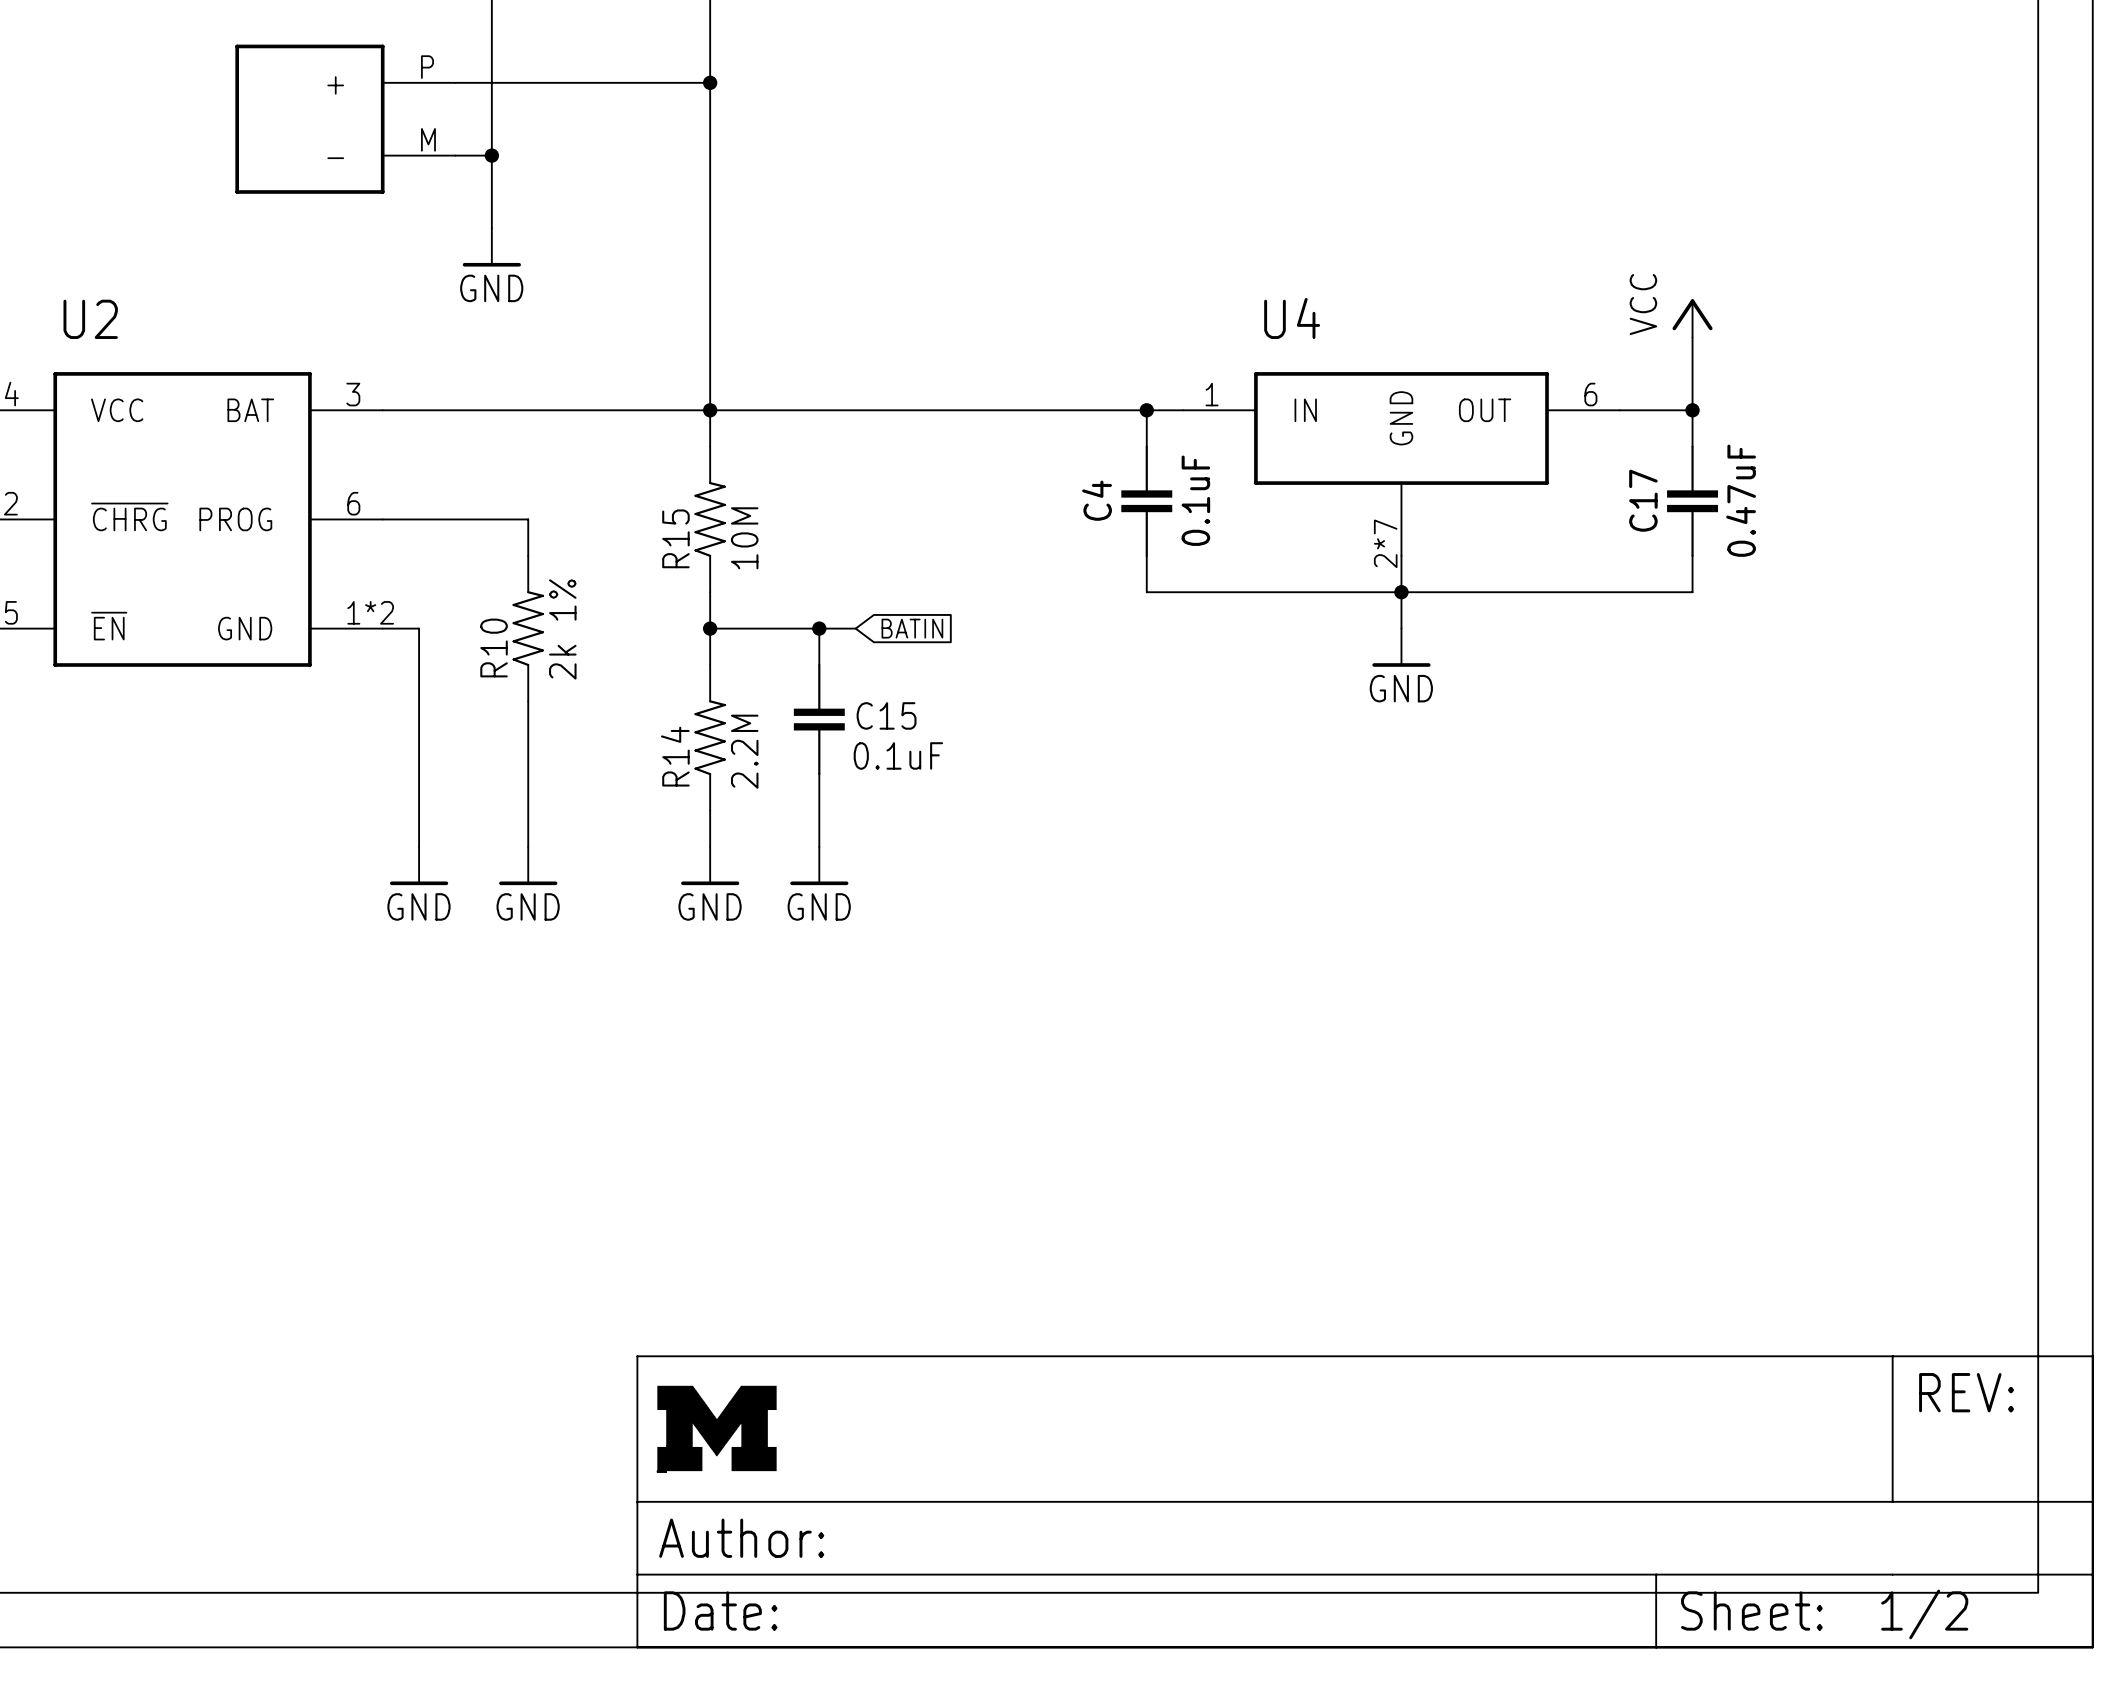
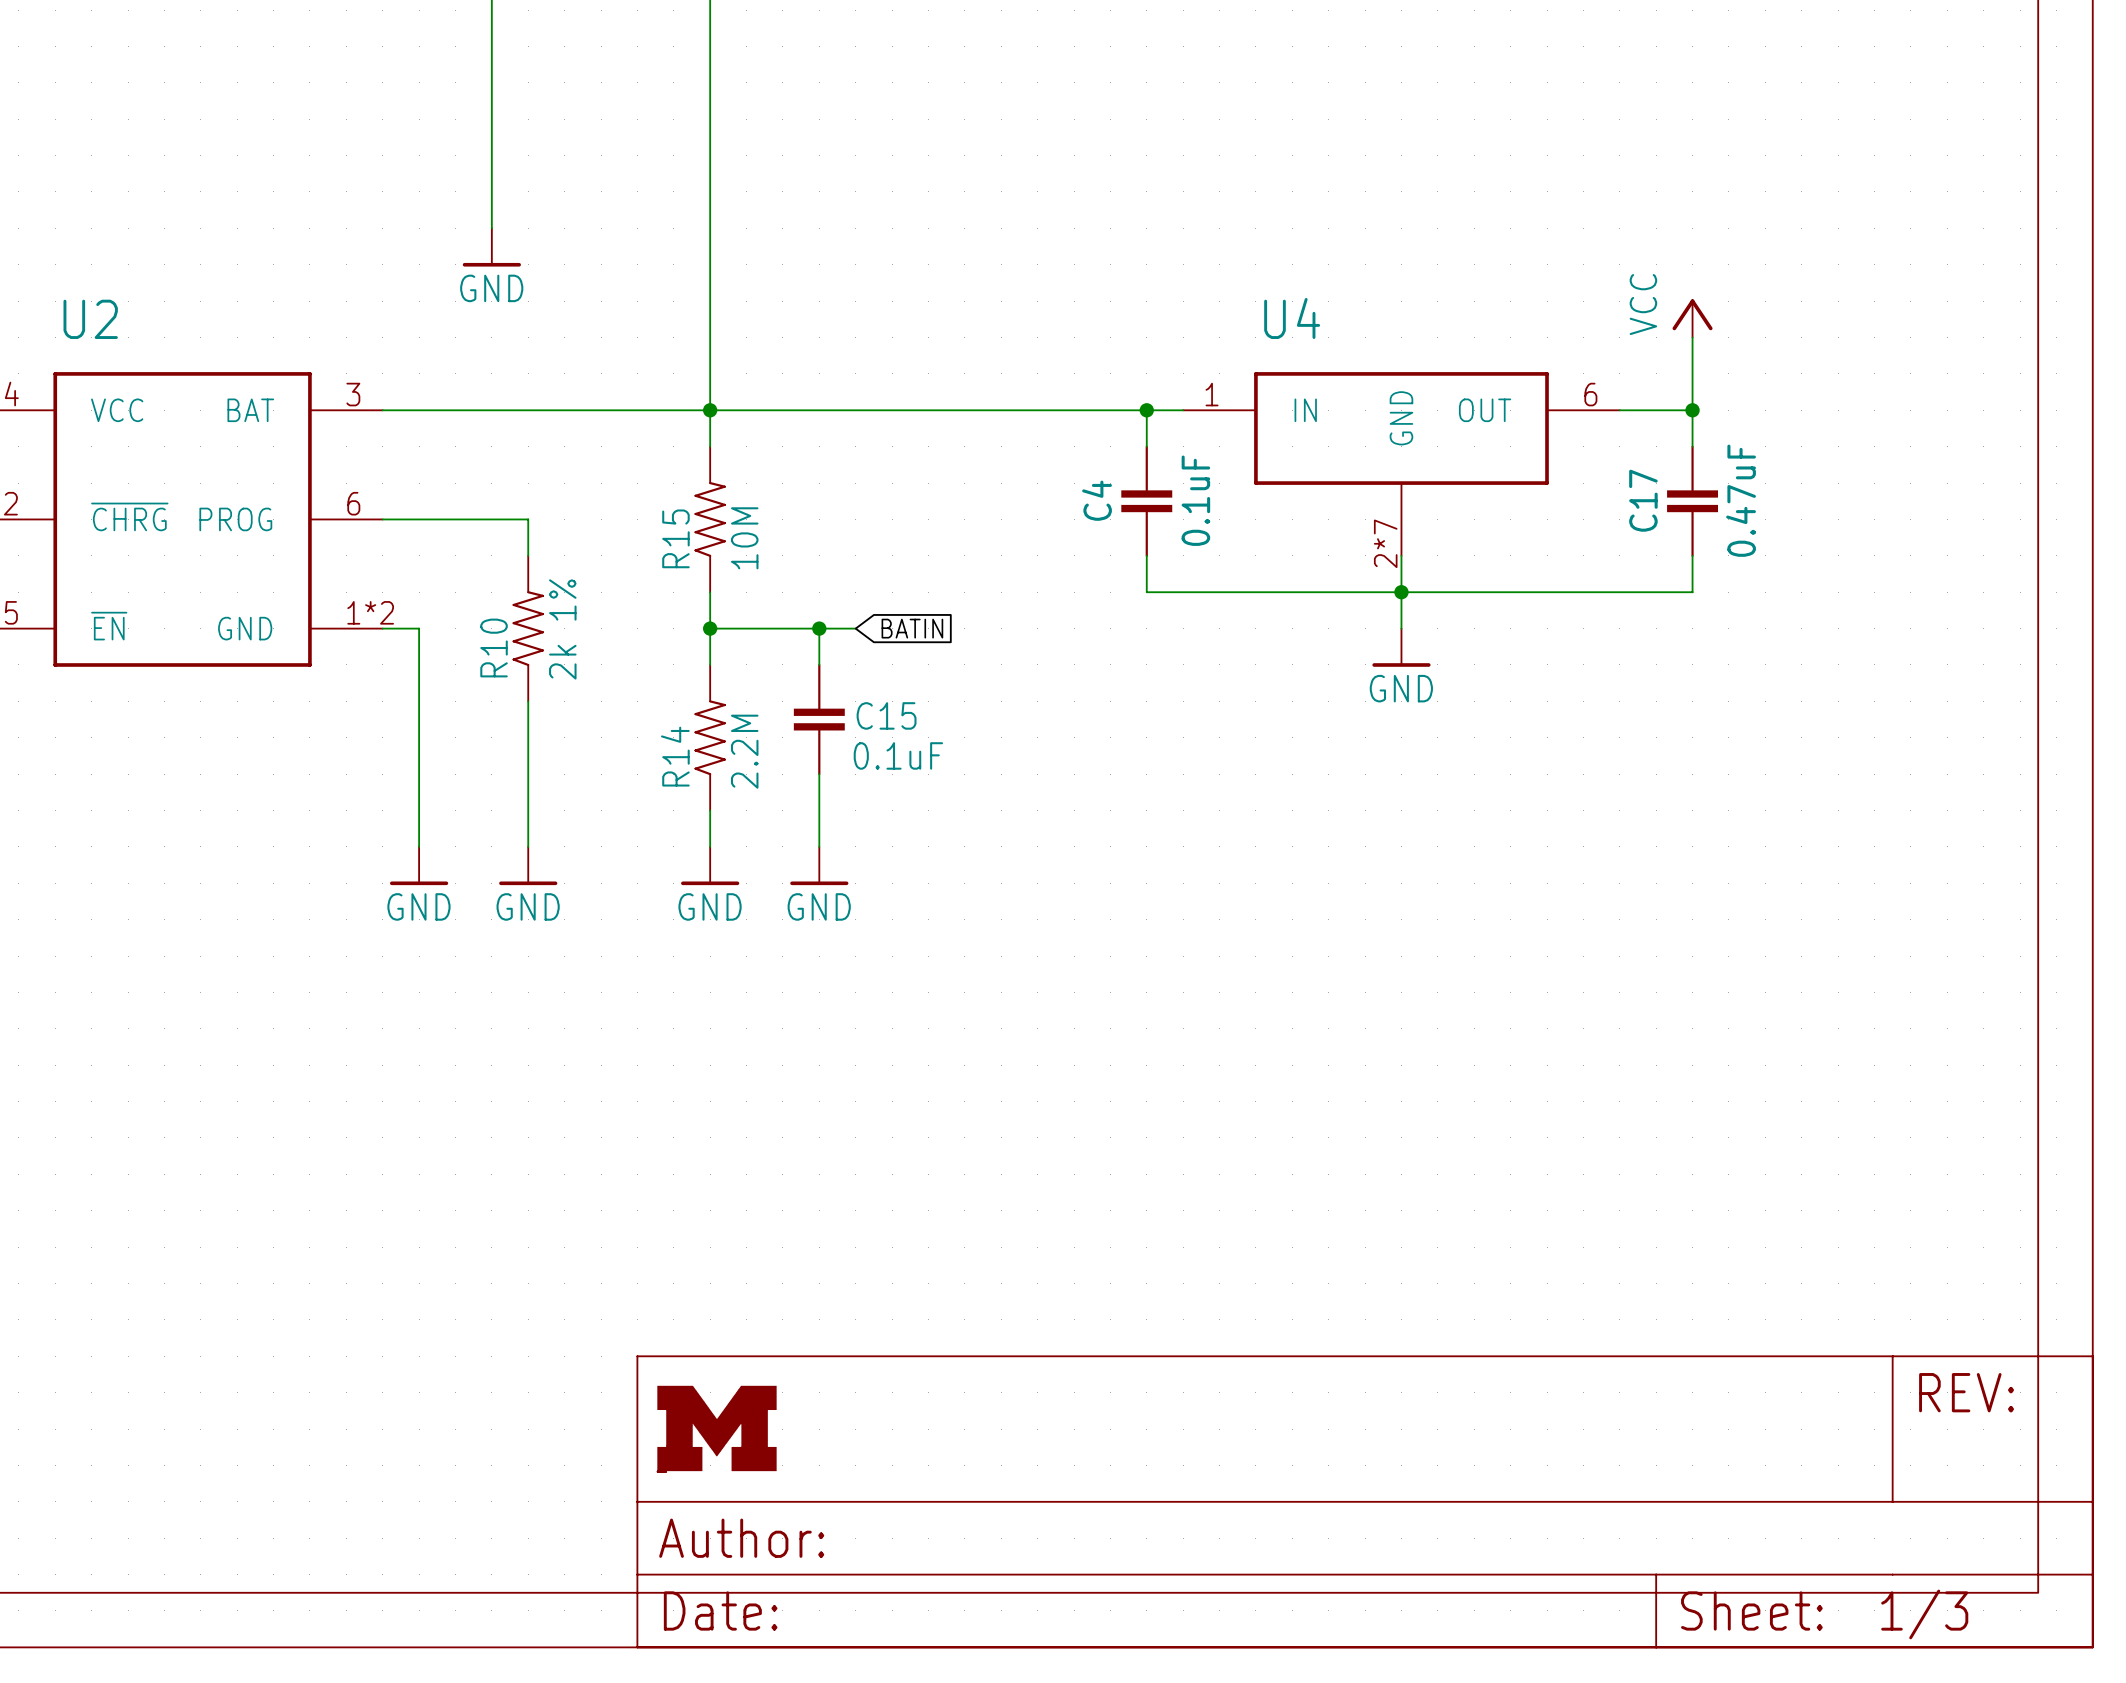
wire: (455, 82) (710, 82) -> none
junction: (710, 82) -> none
part: (345, 119) -> none
wire: (455, 155) (491, 155) -> none
junction: (491, 155) -> none
part text: 1/2 (1924, 1614) -> 1/3 (1924, 1614)

